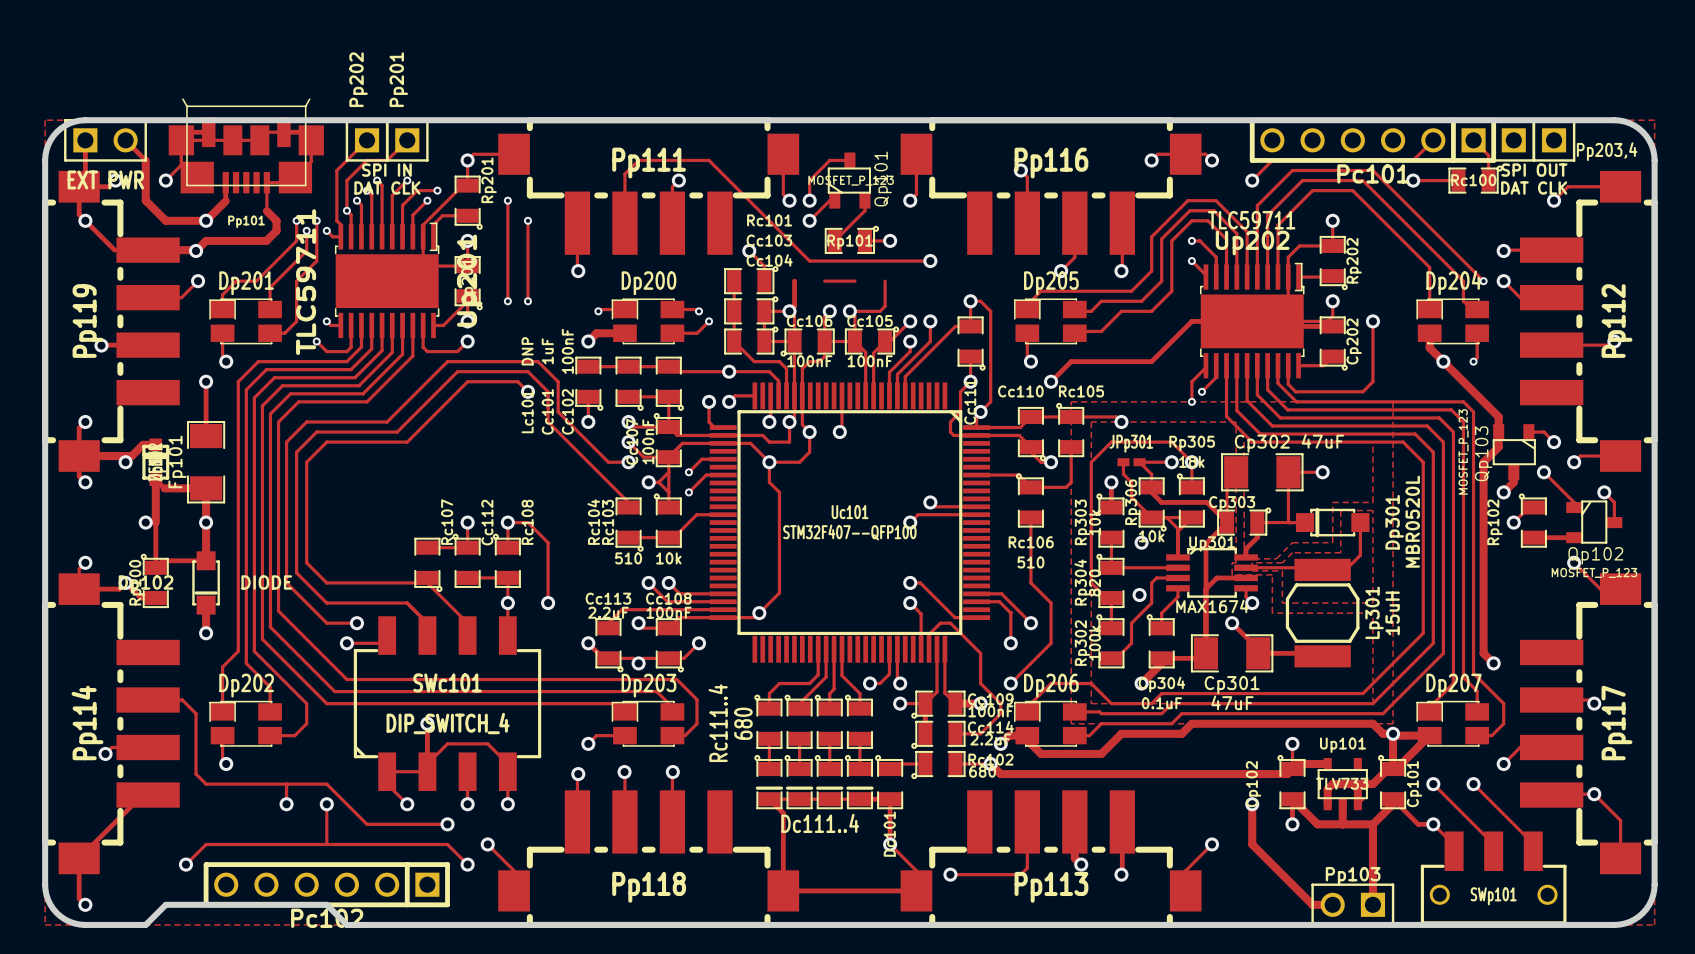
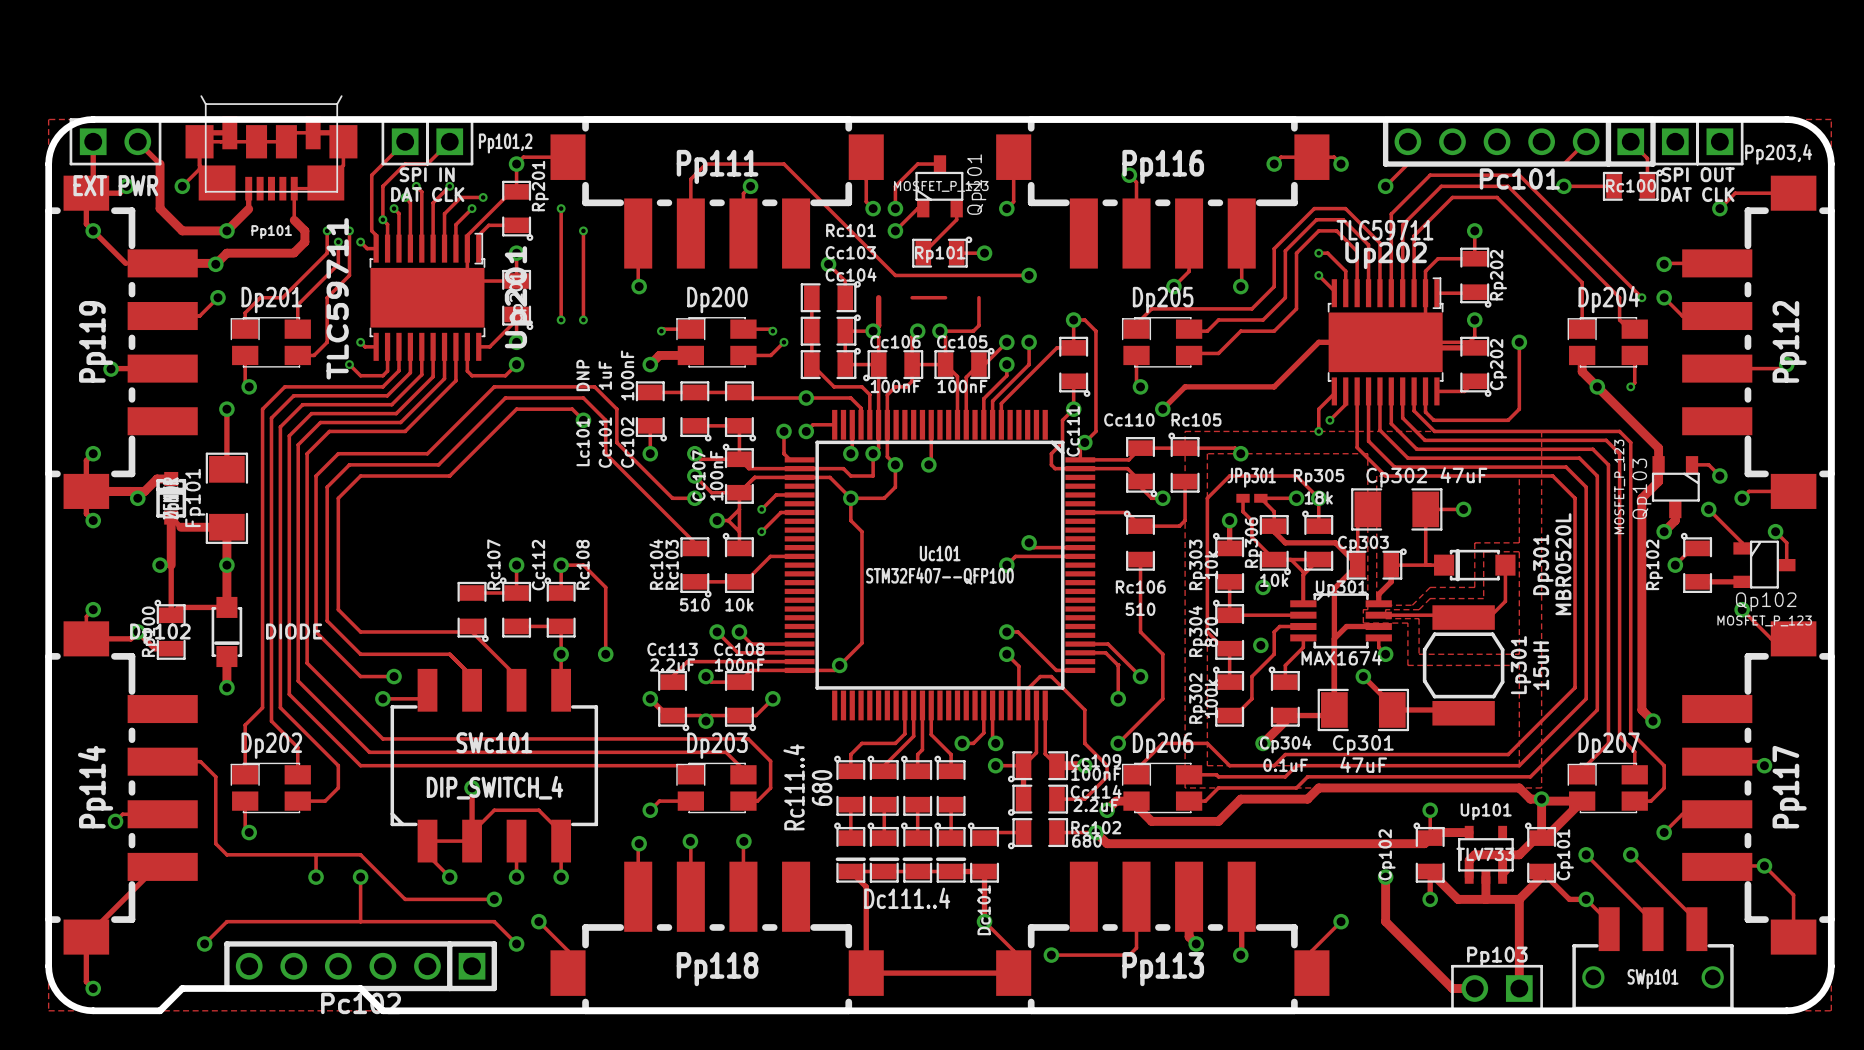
Pp202 name: Pp202 (358, 79) -> none
Pp201 name: Pp201 (398, 79) -> none
text: none -> Pp101,2 (505, 143)

